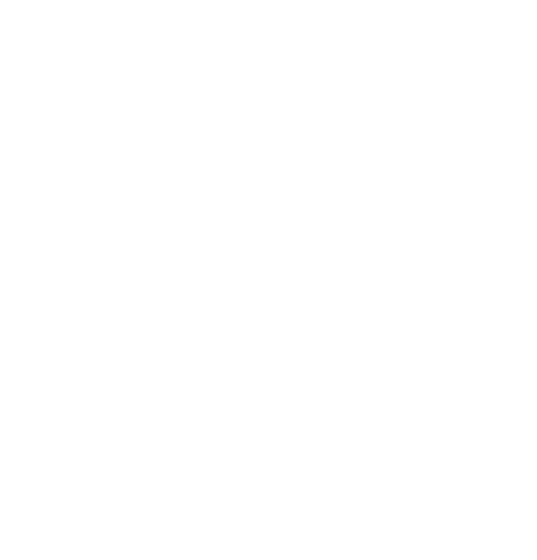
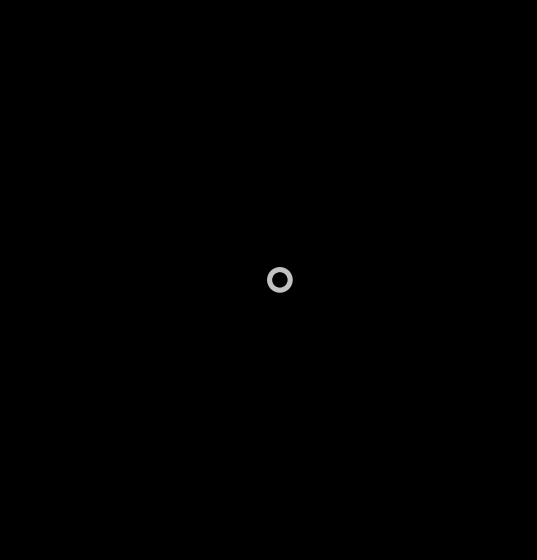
via: none -> (279, 279)

